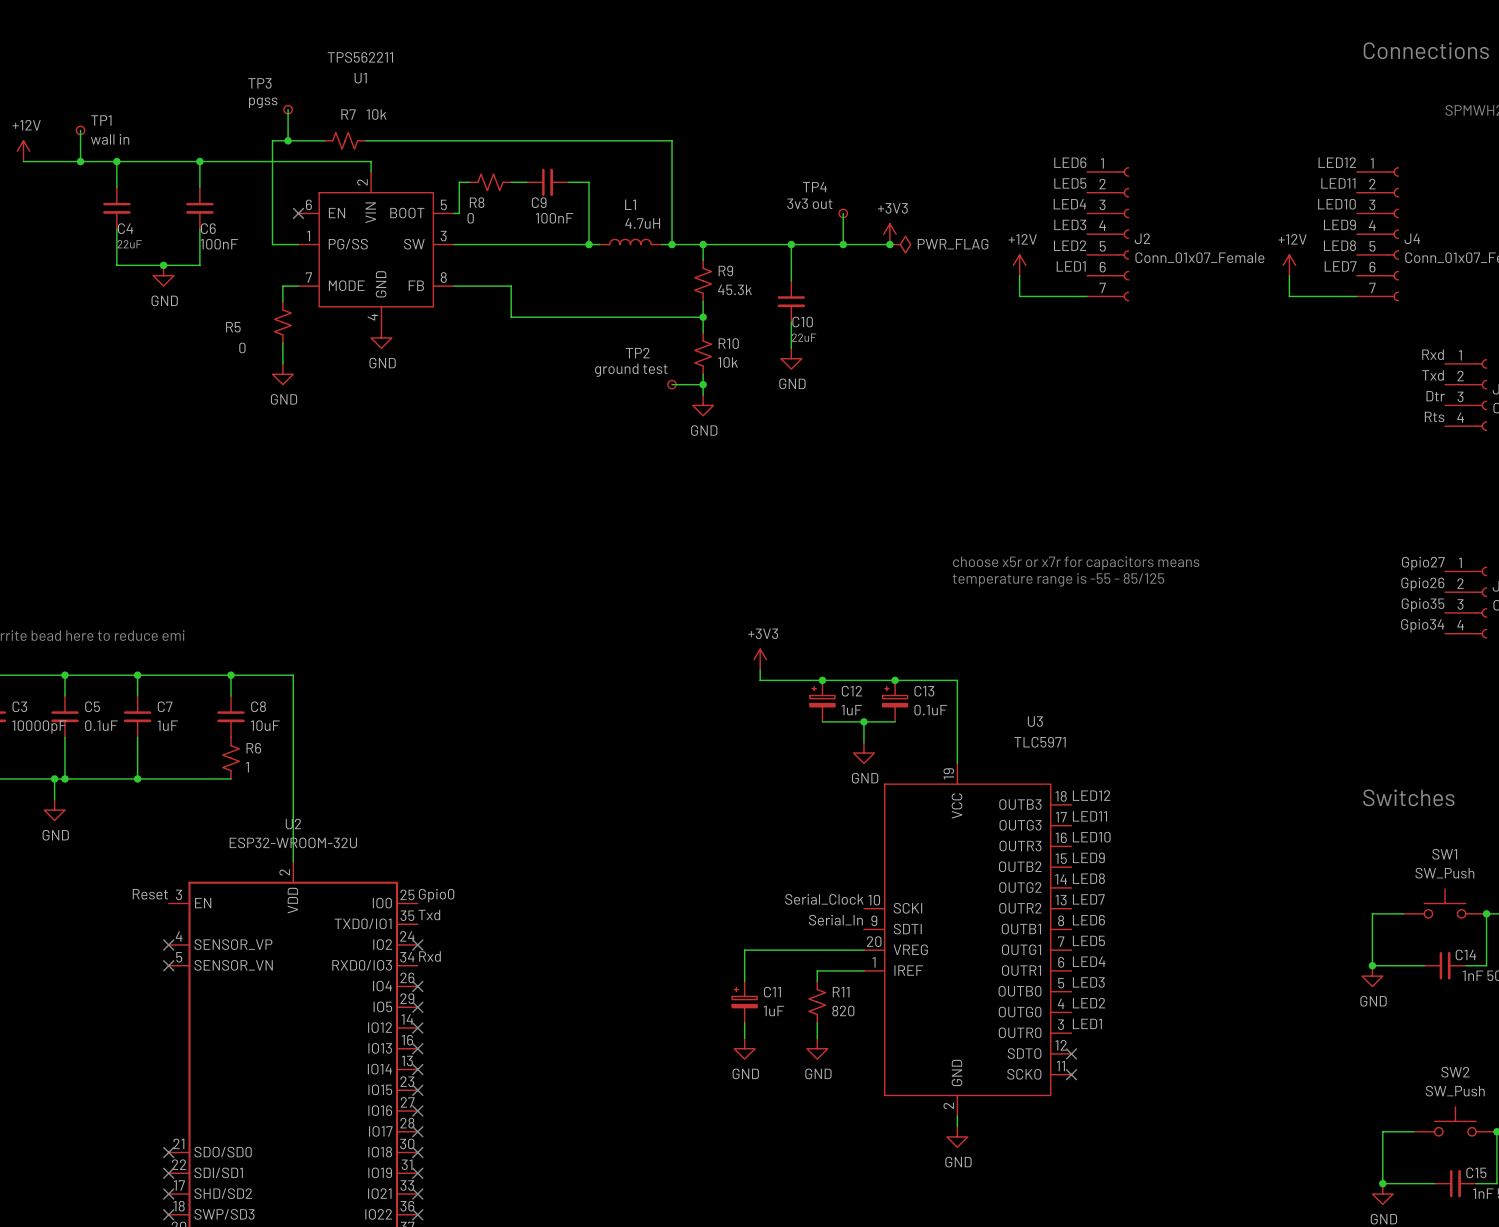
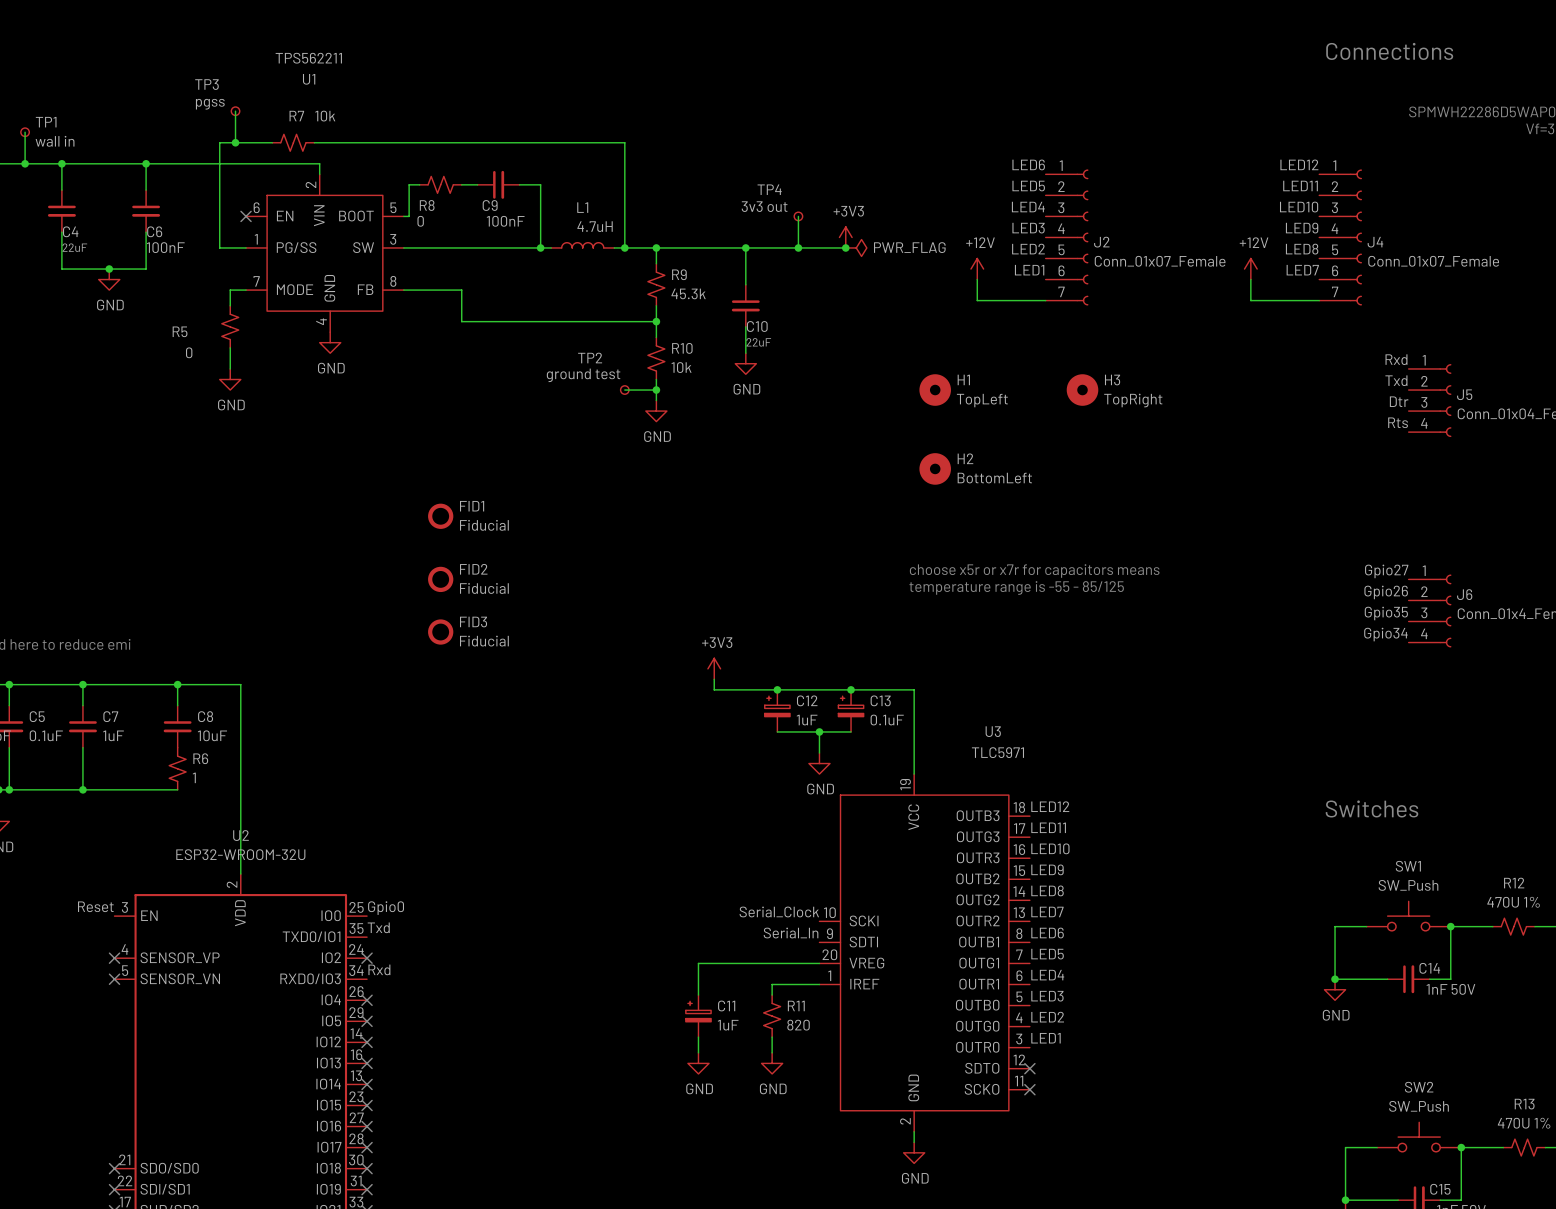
H1: none -> TopLeft (935, 390)
H3: none -> TopRight (1082, 390)
H2: none -> BottomLeft (935, 468)
FID1: none -> Fiducial (440, 516)
FID2: none -> Fiducial (440, 579)
FID3: none -> Fiducial (440, 632)

